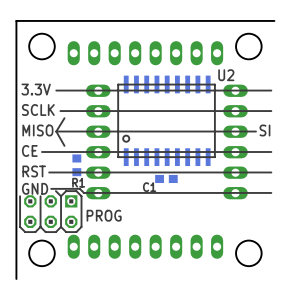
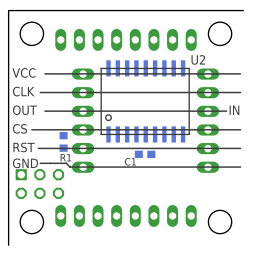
text: 3.3V (36, 89) -> VCC (24, 72)
text: SCLK (38, 110) -> CLK (23, 91)
line: none -> (48, 92) (40, 92)
line: (64, 118) (56, 131) (64, 145) -> none
text: MISO (37, 130) -> OUT (24, 110)
text: SI (264, 130) -> IN (234, 110)
text: CE (29, 150) -> CS (19, 128)
PROG: (50, 211) -> none
part: none -> (39, 184)

